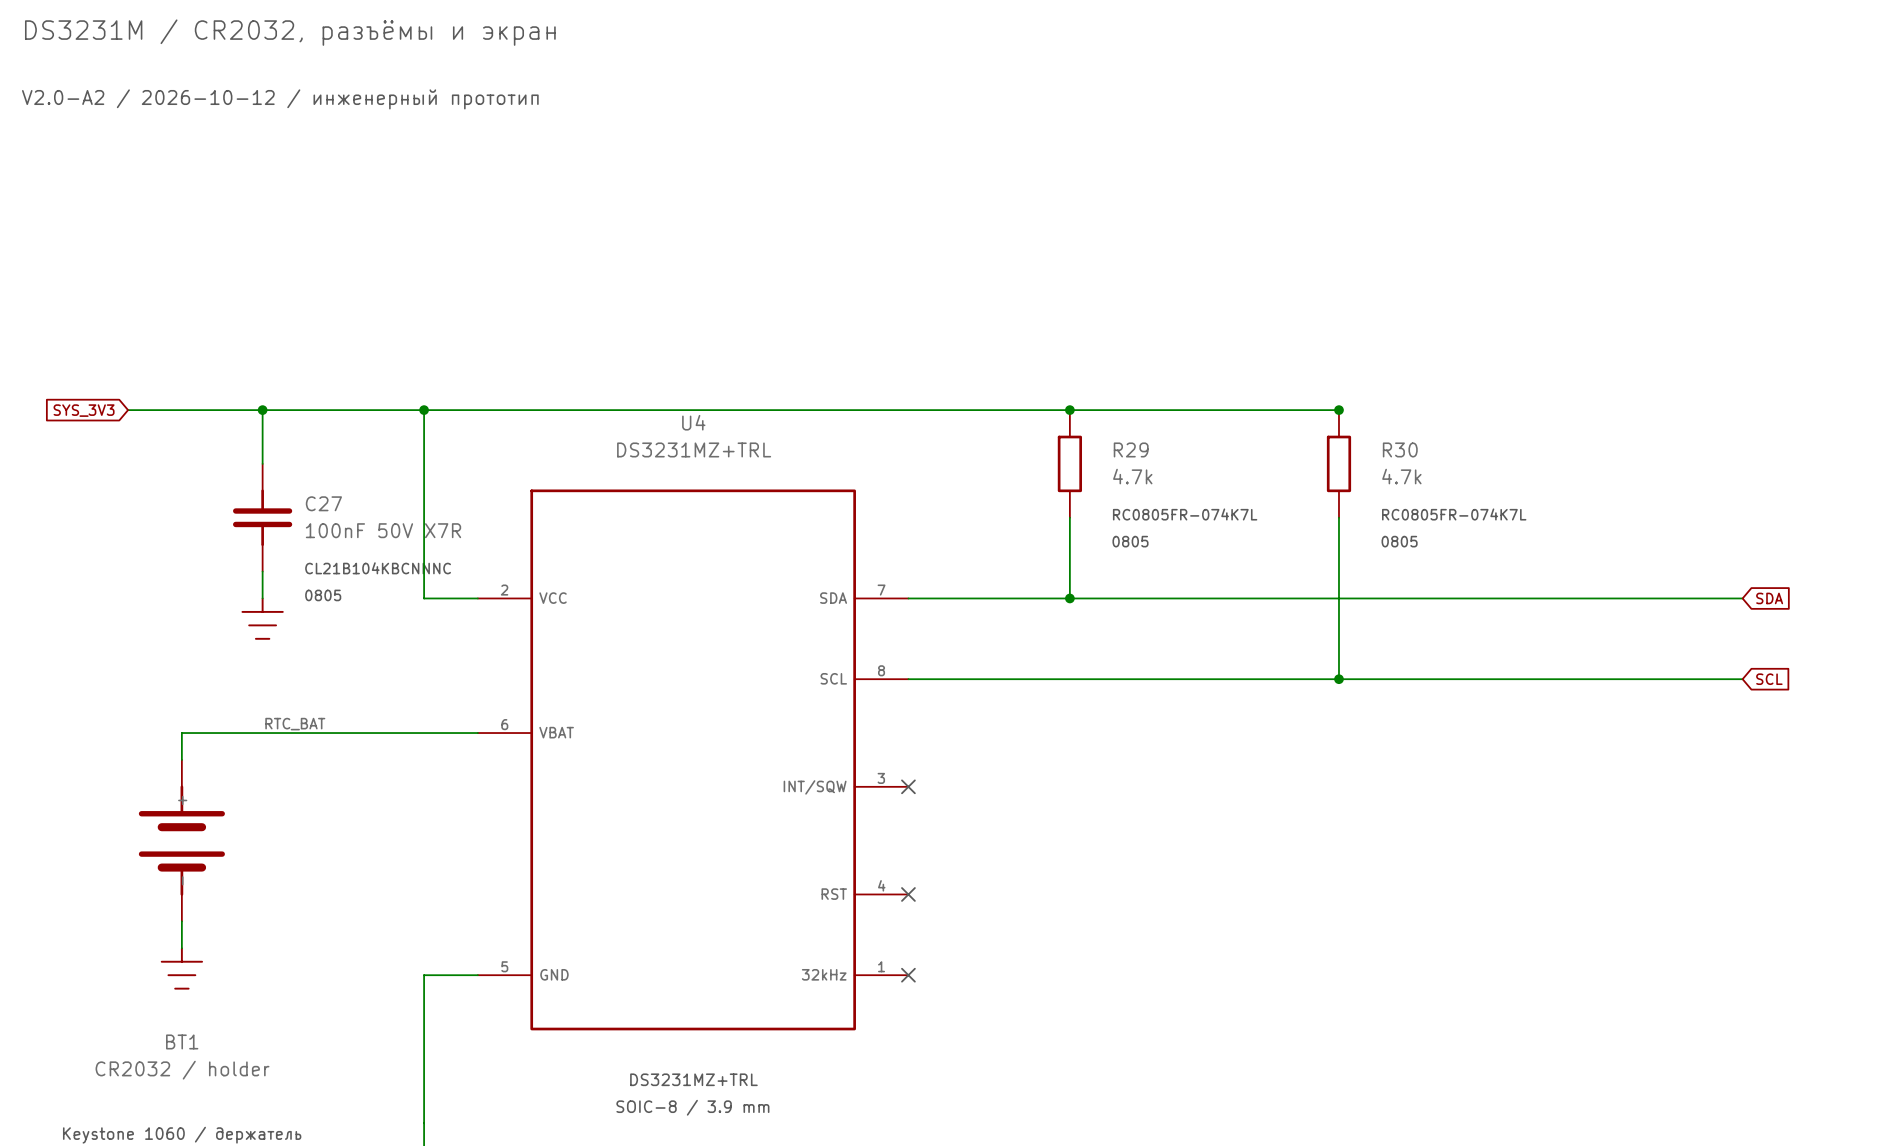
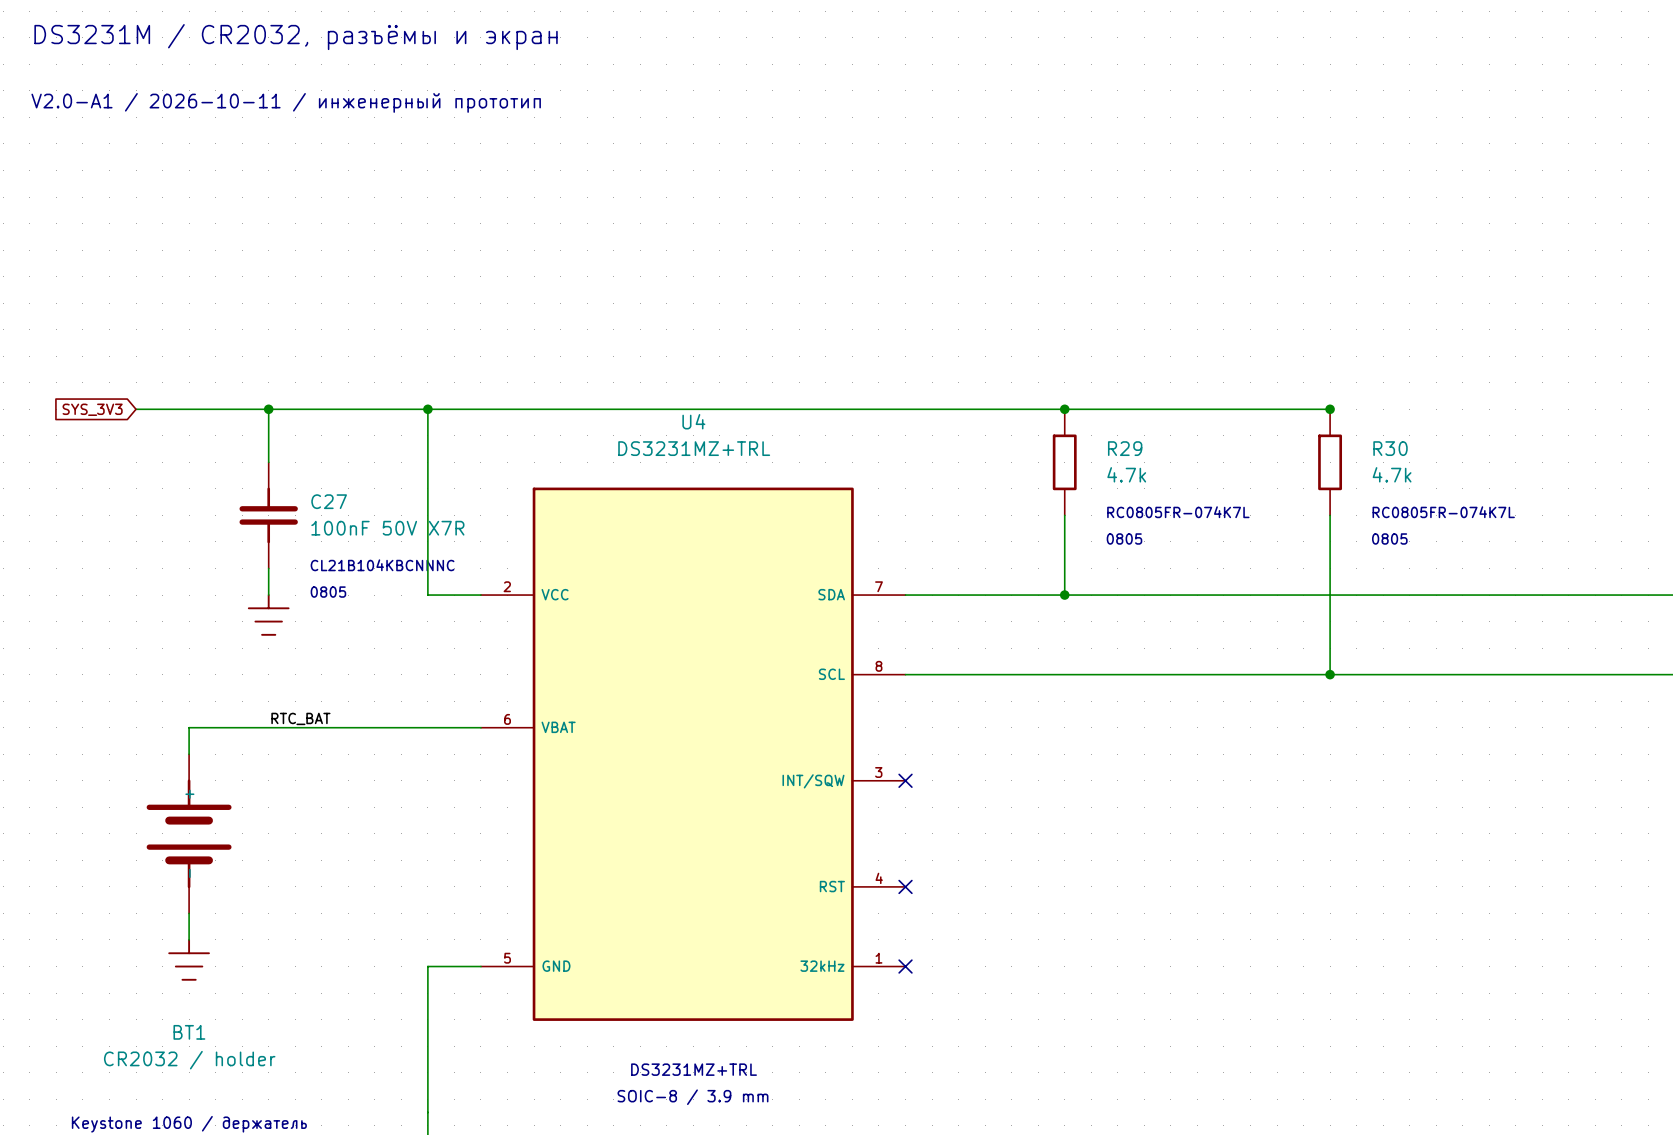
text: V2.0-A2 / 2026-10-12 / инженерный прототип (280, 99) -> V2.0-A1 / 2026-10-11 / инженерный прототип (286, 102)

